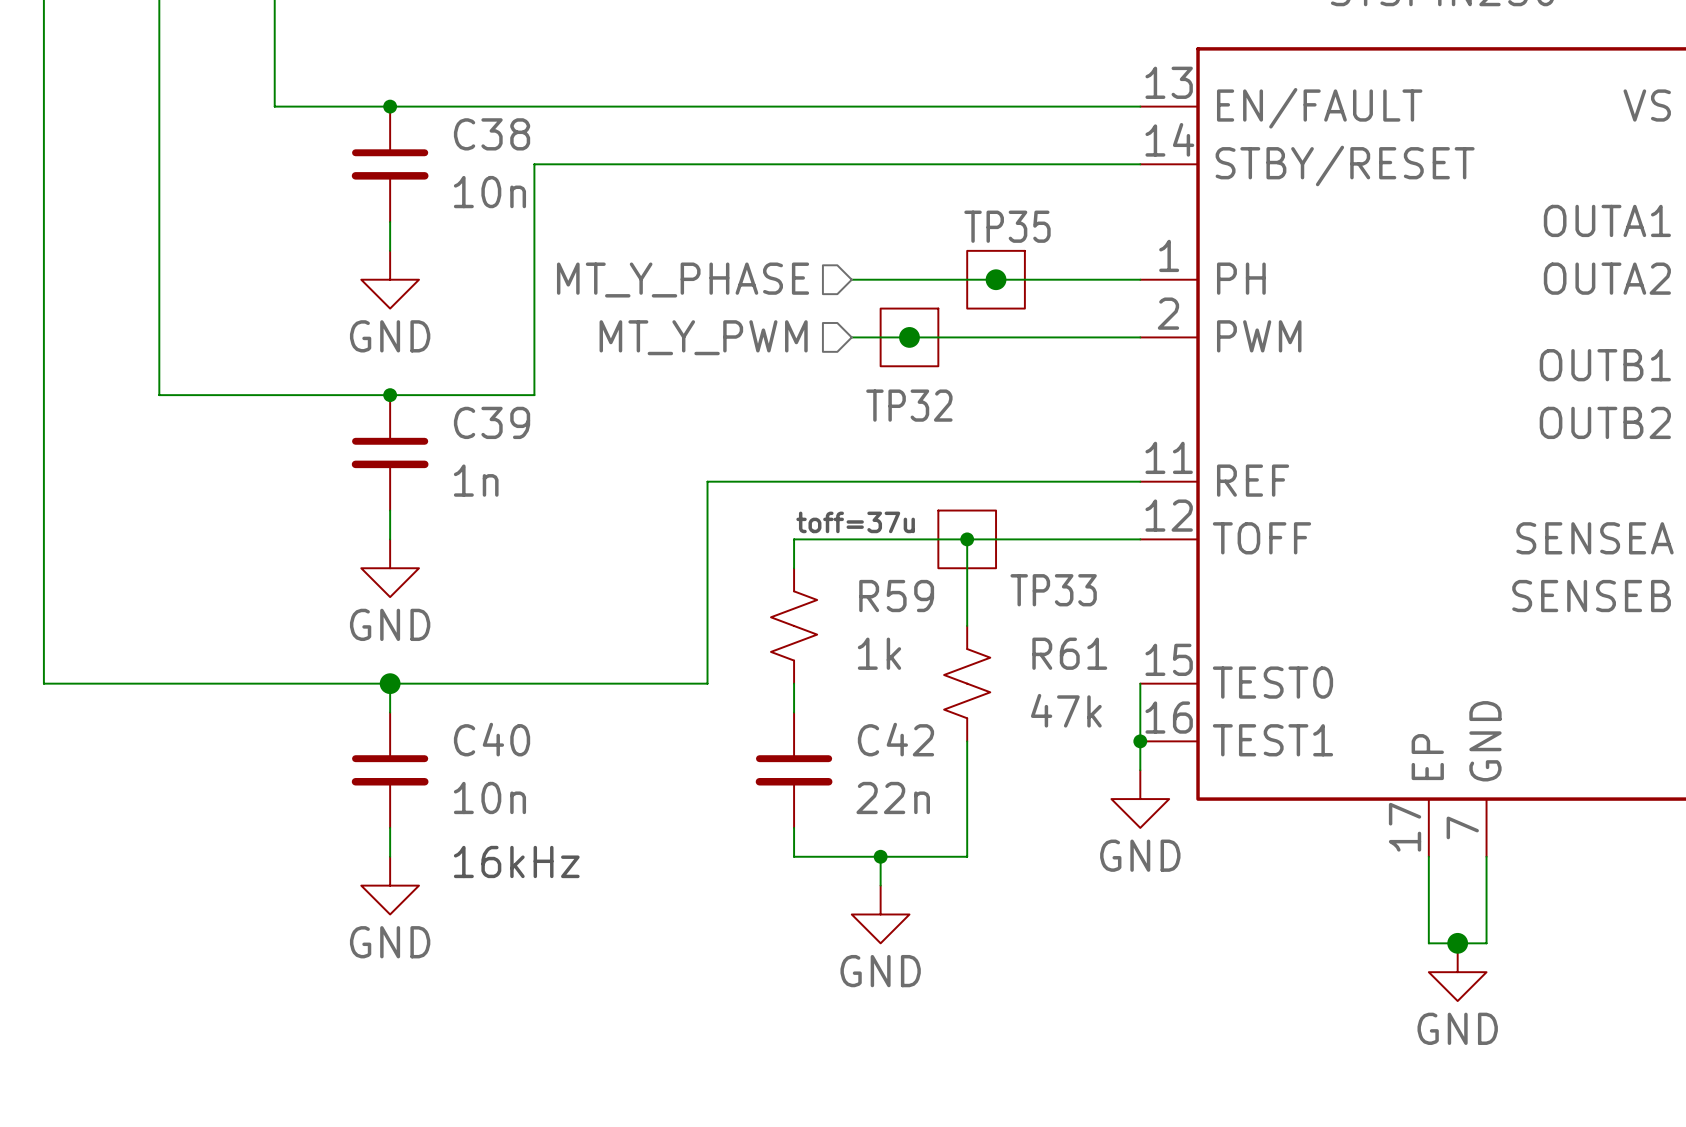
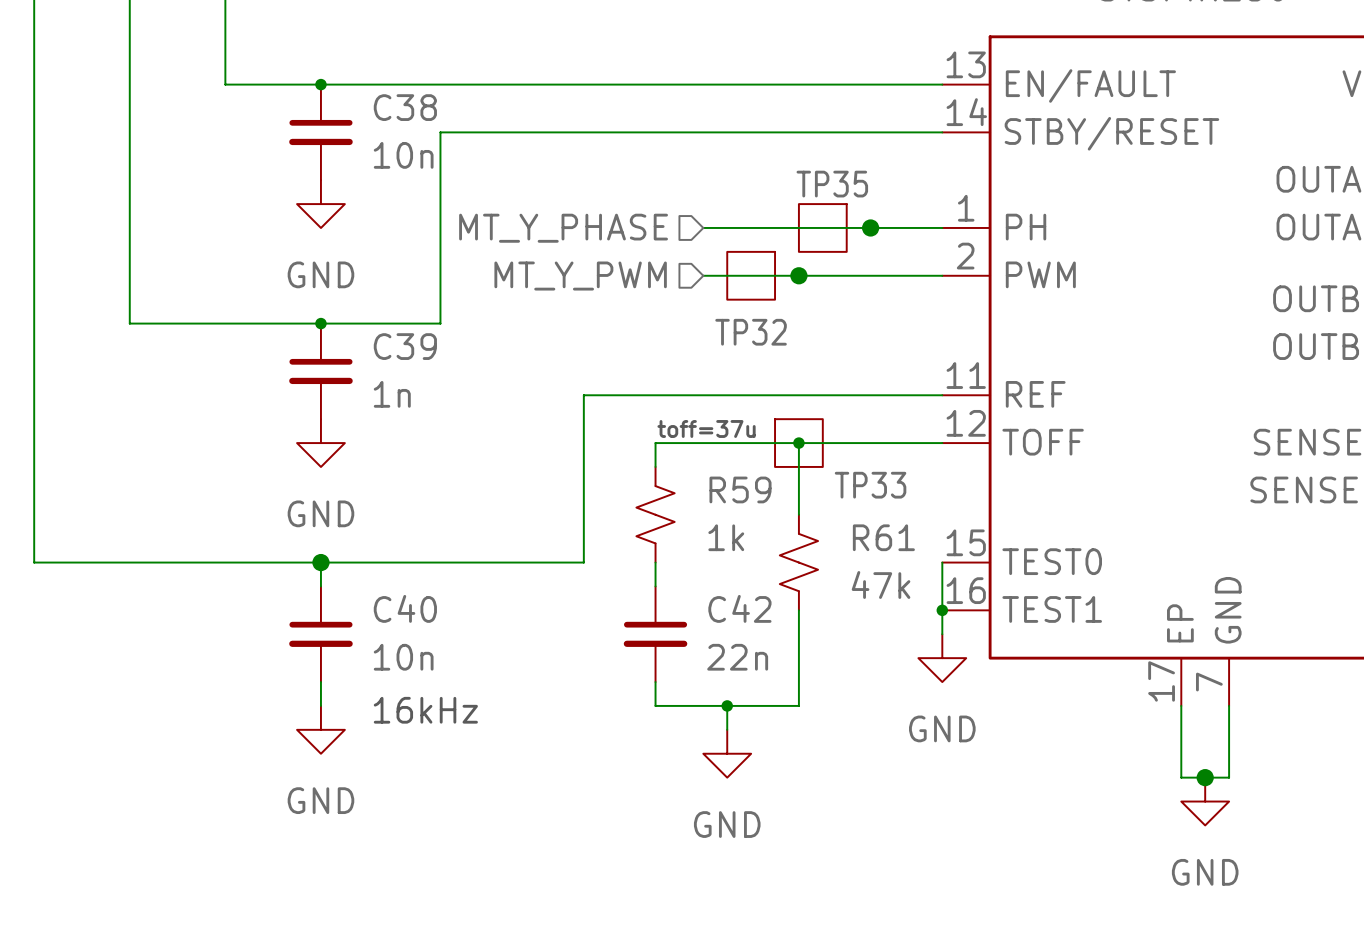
power symbol position: GND (390, 279) -> GND (320, 204)
junction: (996, 279) -> none
junction: none -> (870, 227)
junction: (909, 337) -> none
junction: none -> (798, 275)
power symbol position: GND (390, 568) -> GND (320, 443)
power symbol text position: GND (1140, 855) -> GND (942, 728)
power symbol text position: GND (390, 942) -> GND (320, 800)
power symbol text position: GND (880, 971) -> GND (727, 824)
power symbol text position: GND (1457, 1028) -> GND (1205, 872)

